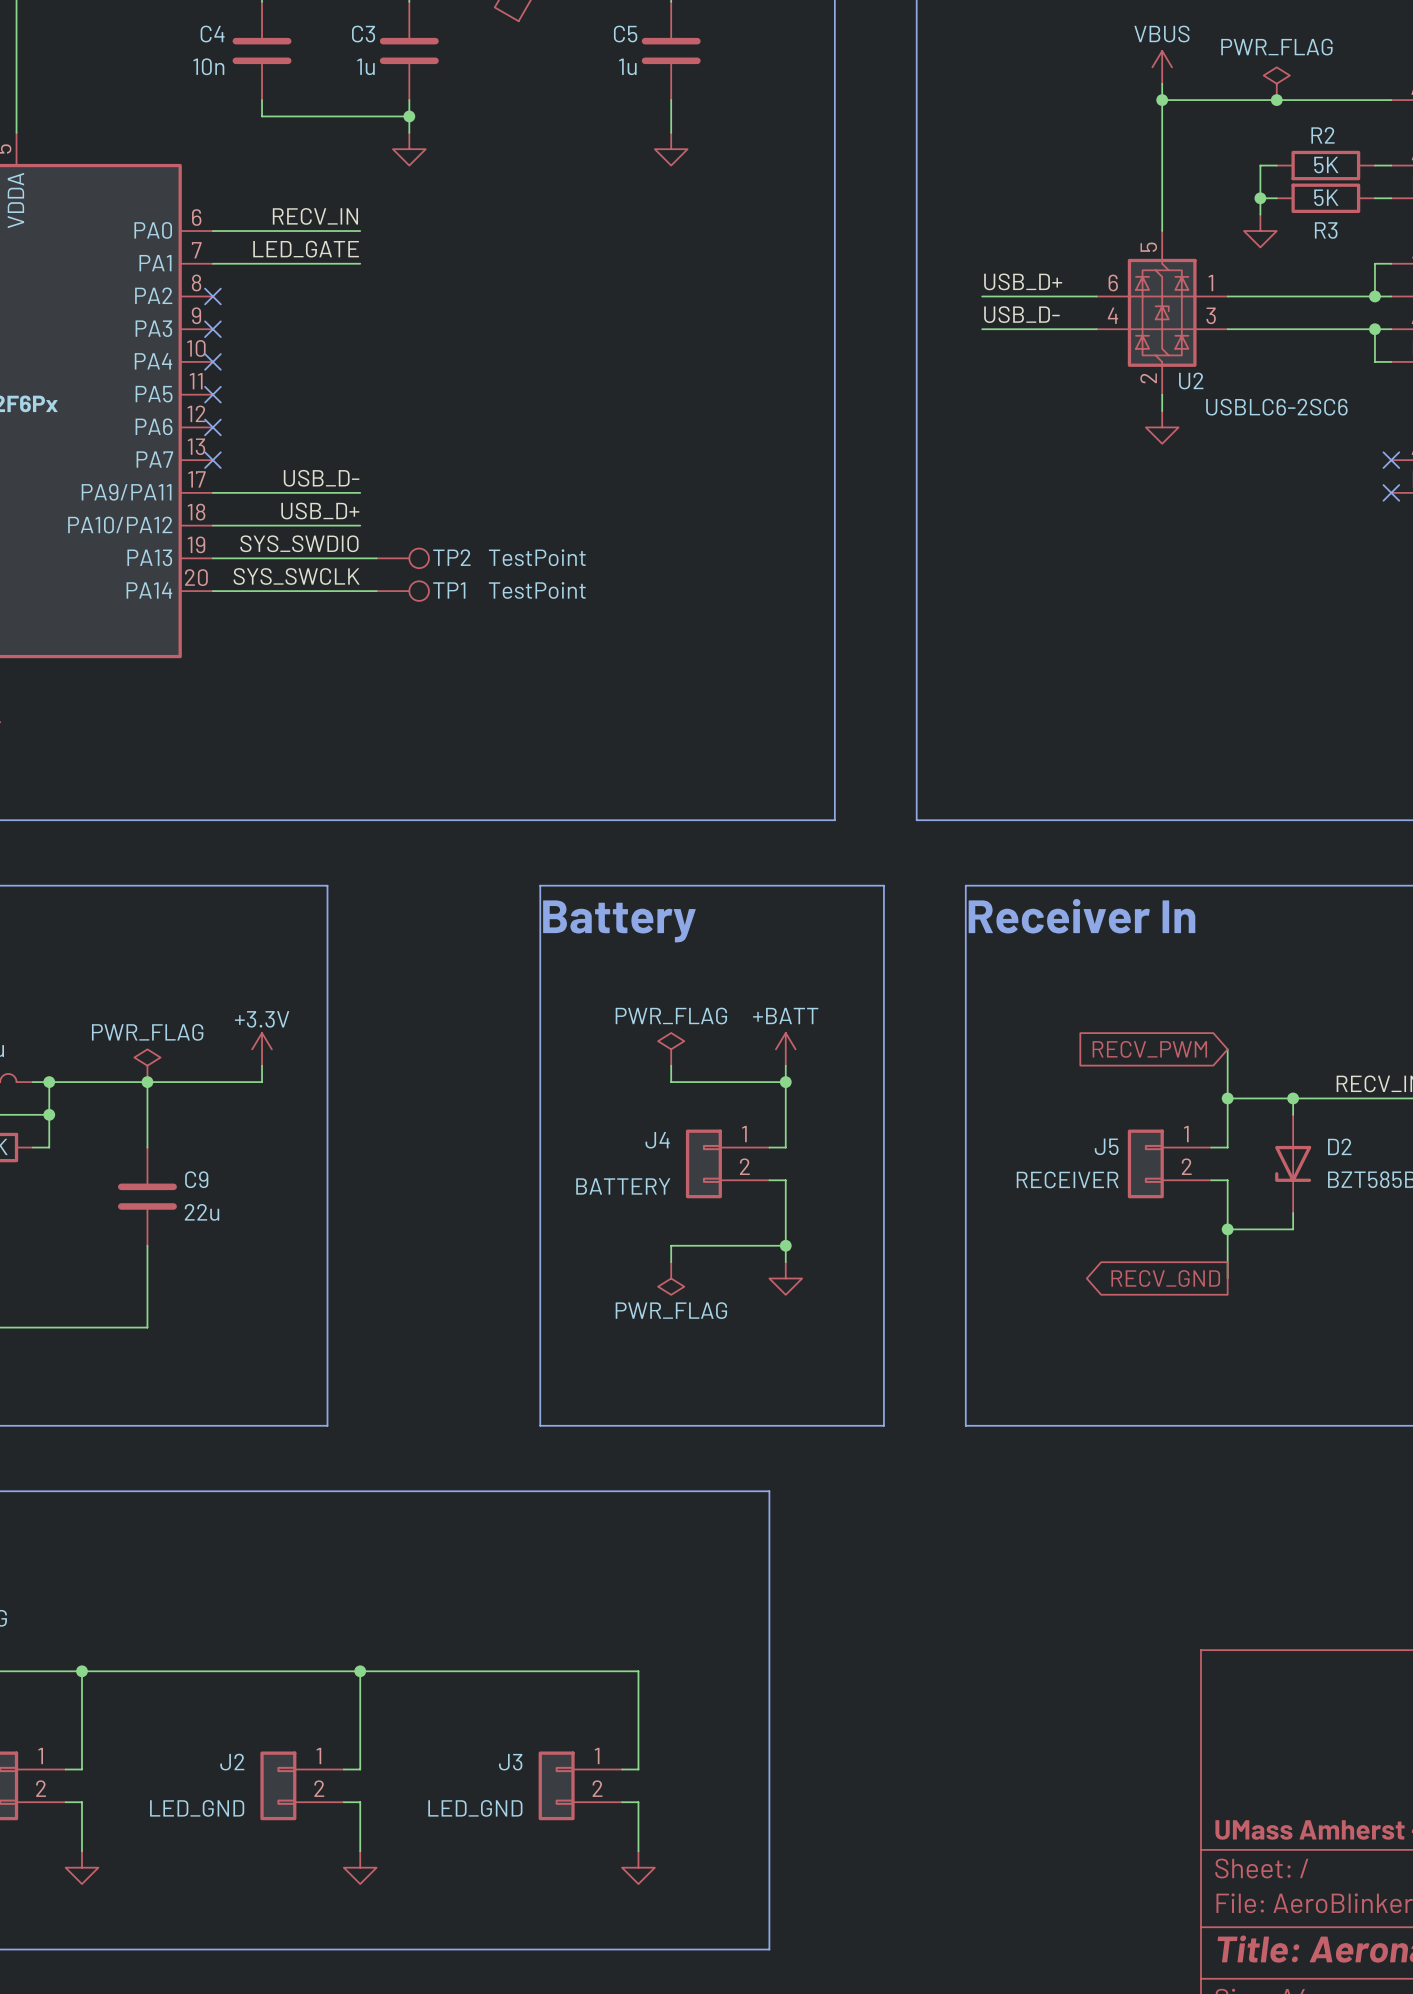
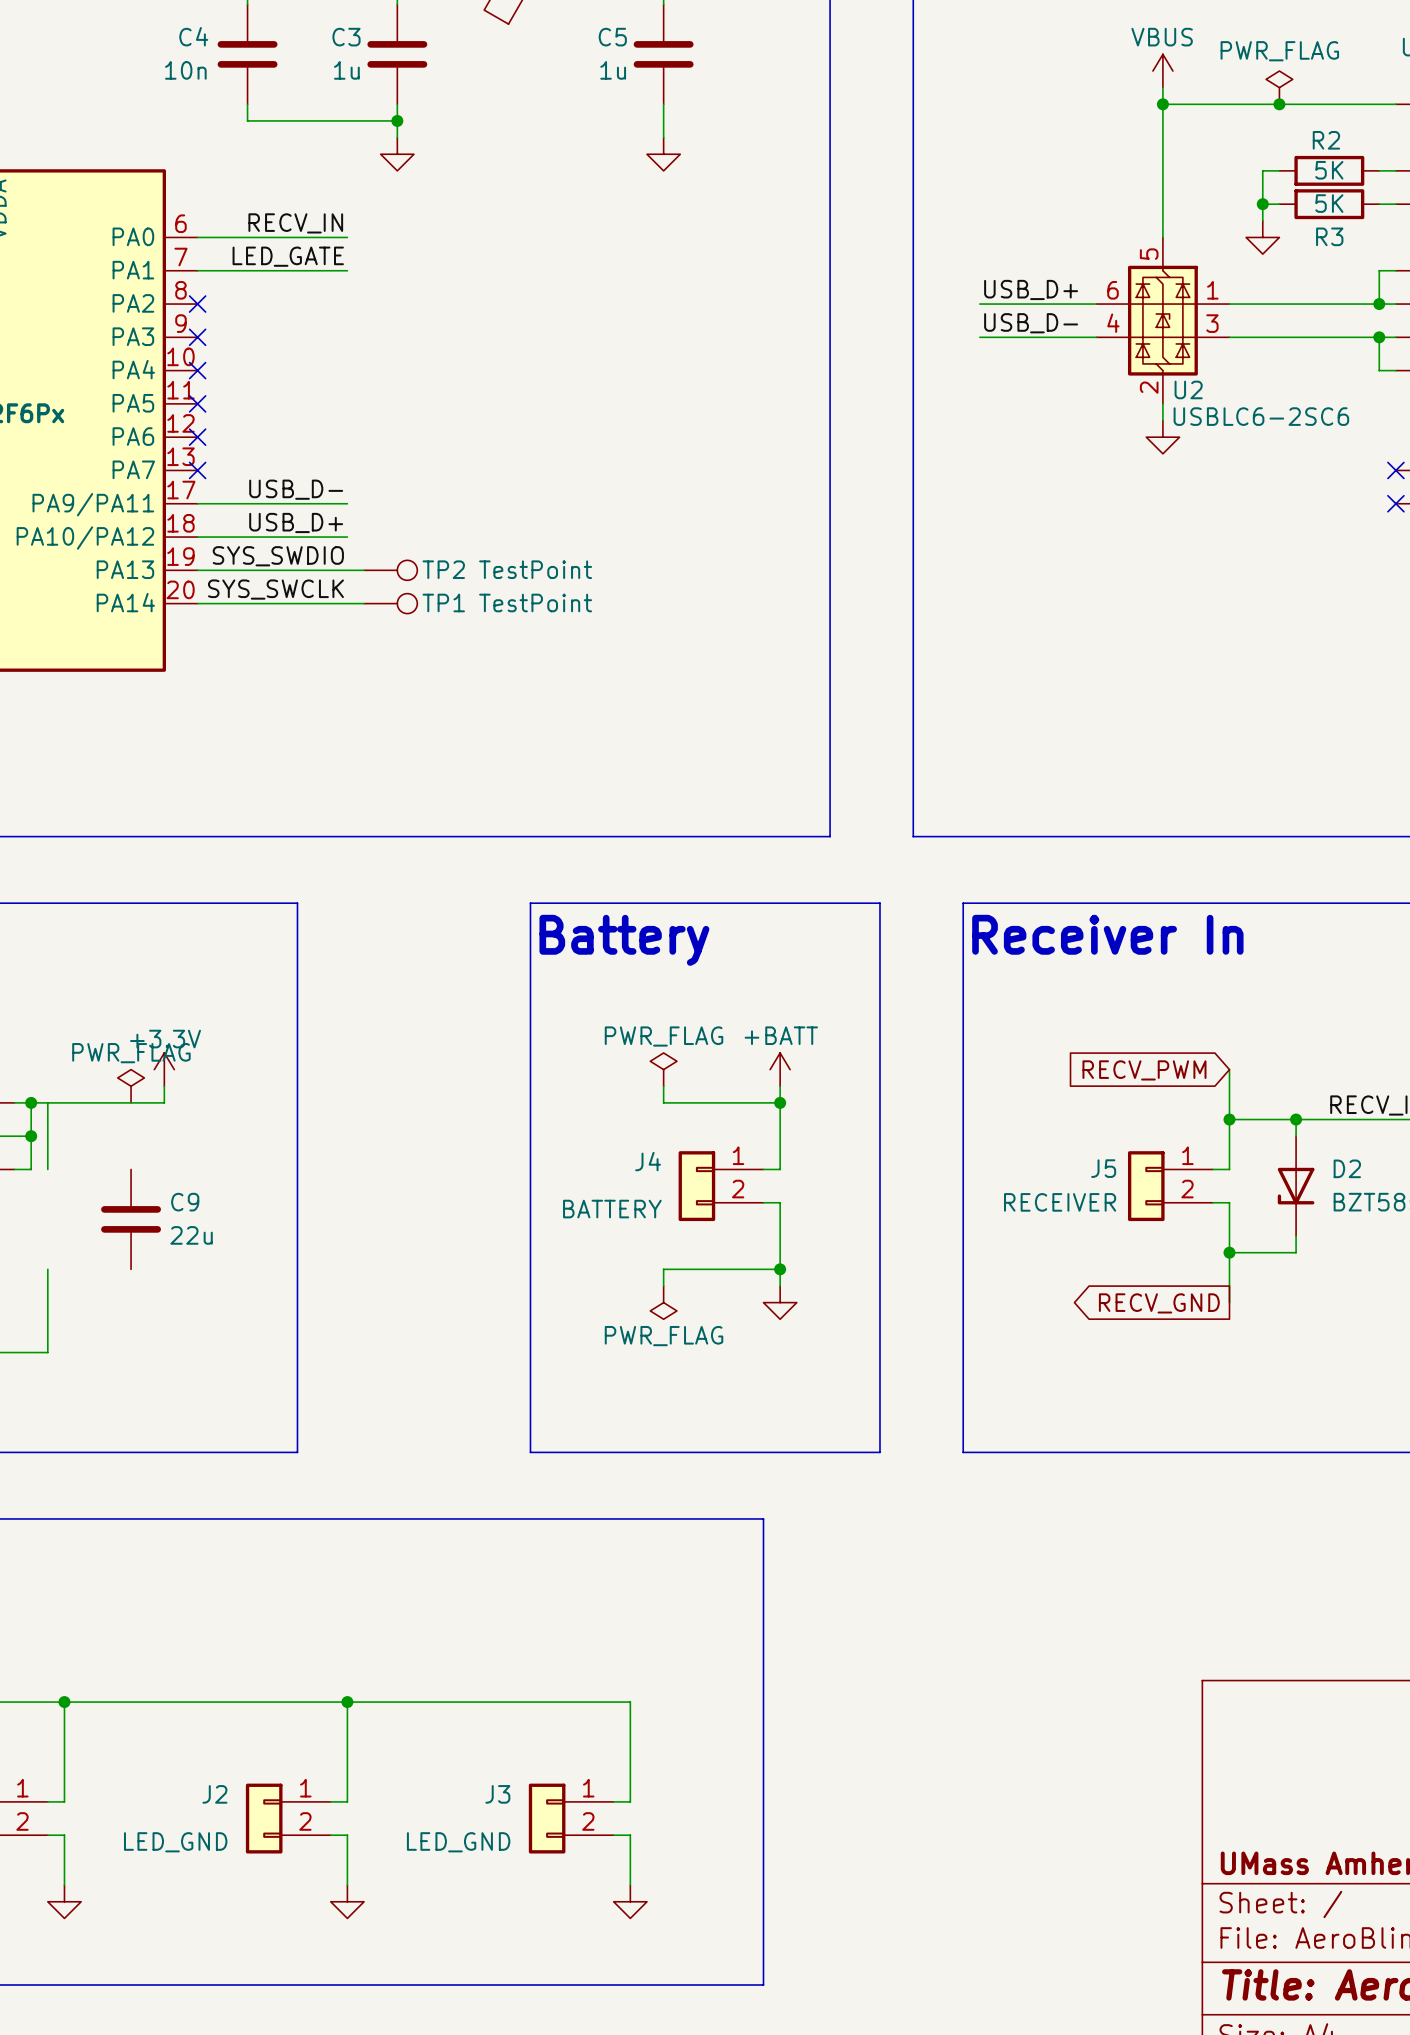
line: (311, 885) (327, 885) (327, 1425) (311, 1425) -> (297, 903) (297, 1452)
power symbol position: +3.3V (262, 1049) -> +3.3V (164, 1069)
wire: (262, 1065) (262, 1082) (180, 1082) -> (164, 1086) (164, 1102)
wire: (147, 1082) (147, 1147) -> (47, 1102) (47, 1169)
junction: (147, 1082) -> none
wire: (147, 1245) (147, 1327) (65, 1327) -> (47, 1269) (47, 1352)

